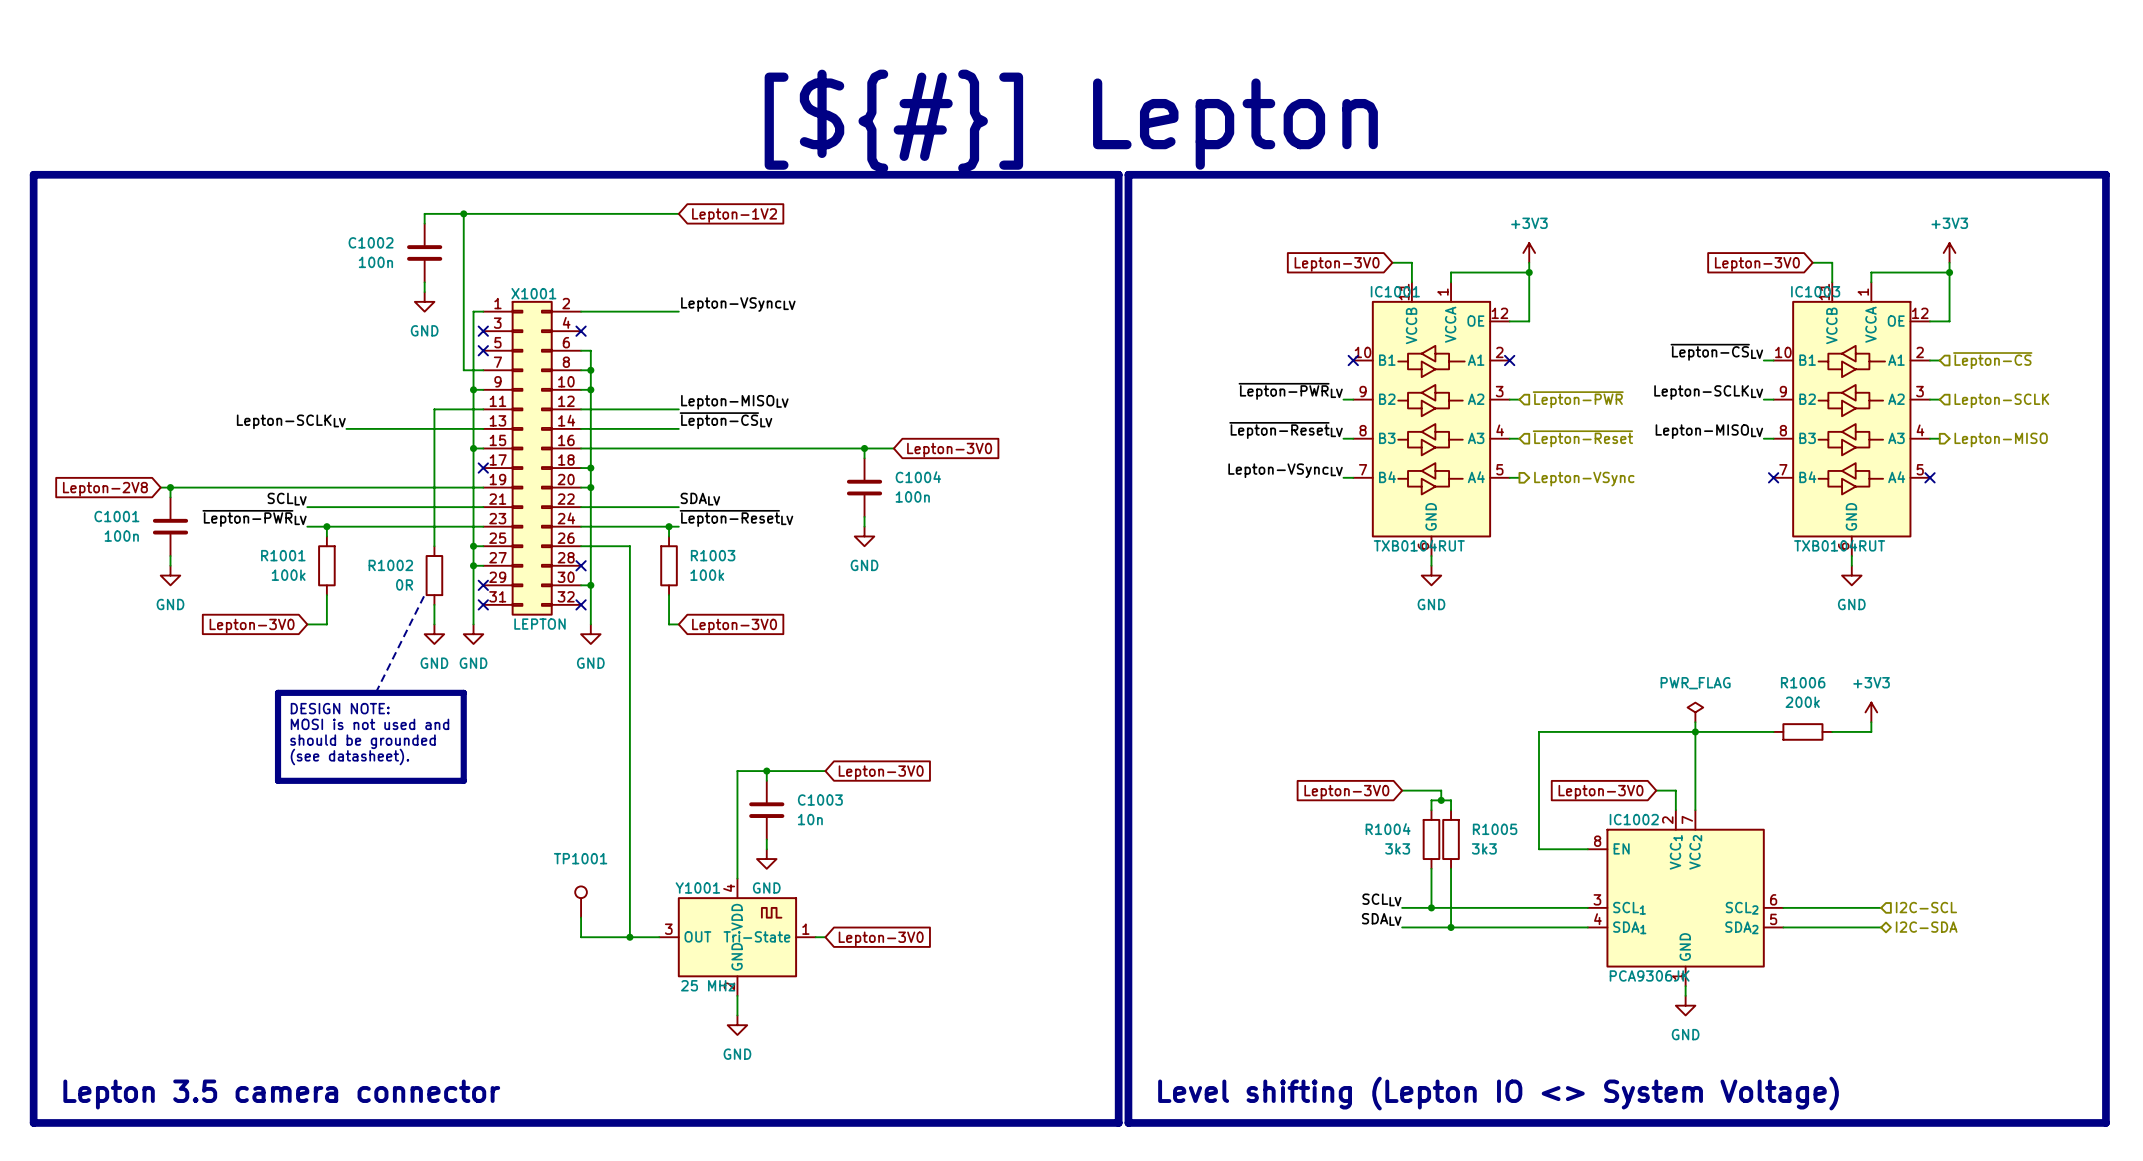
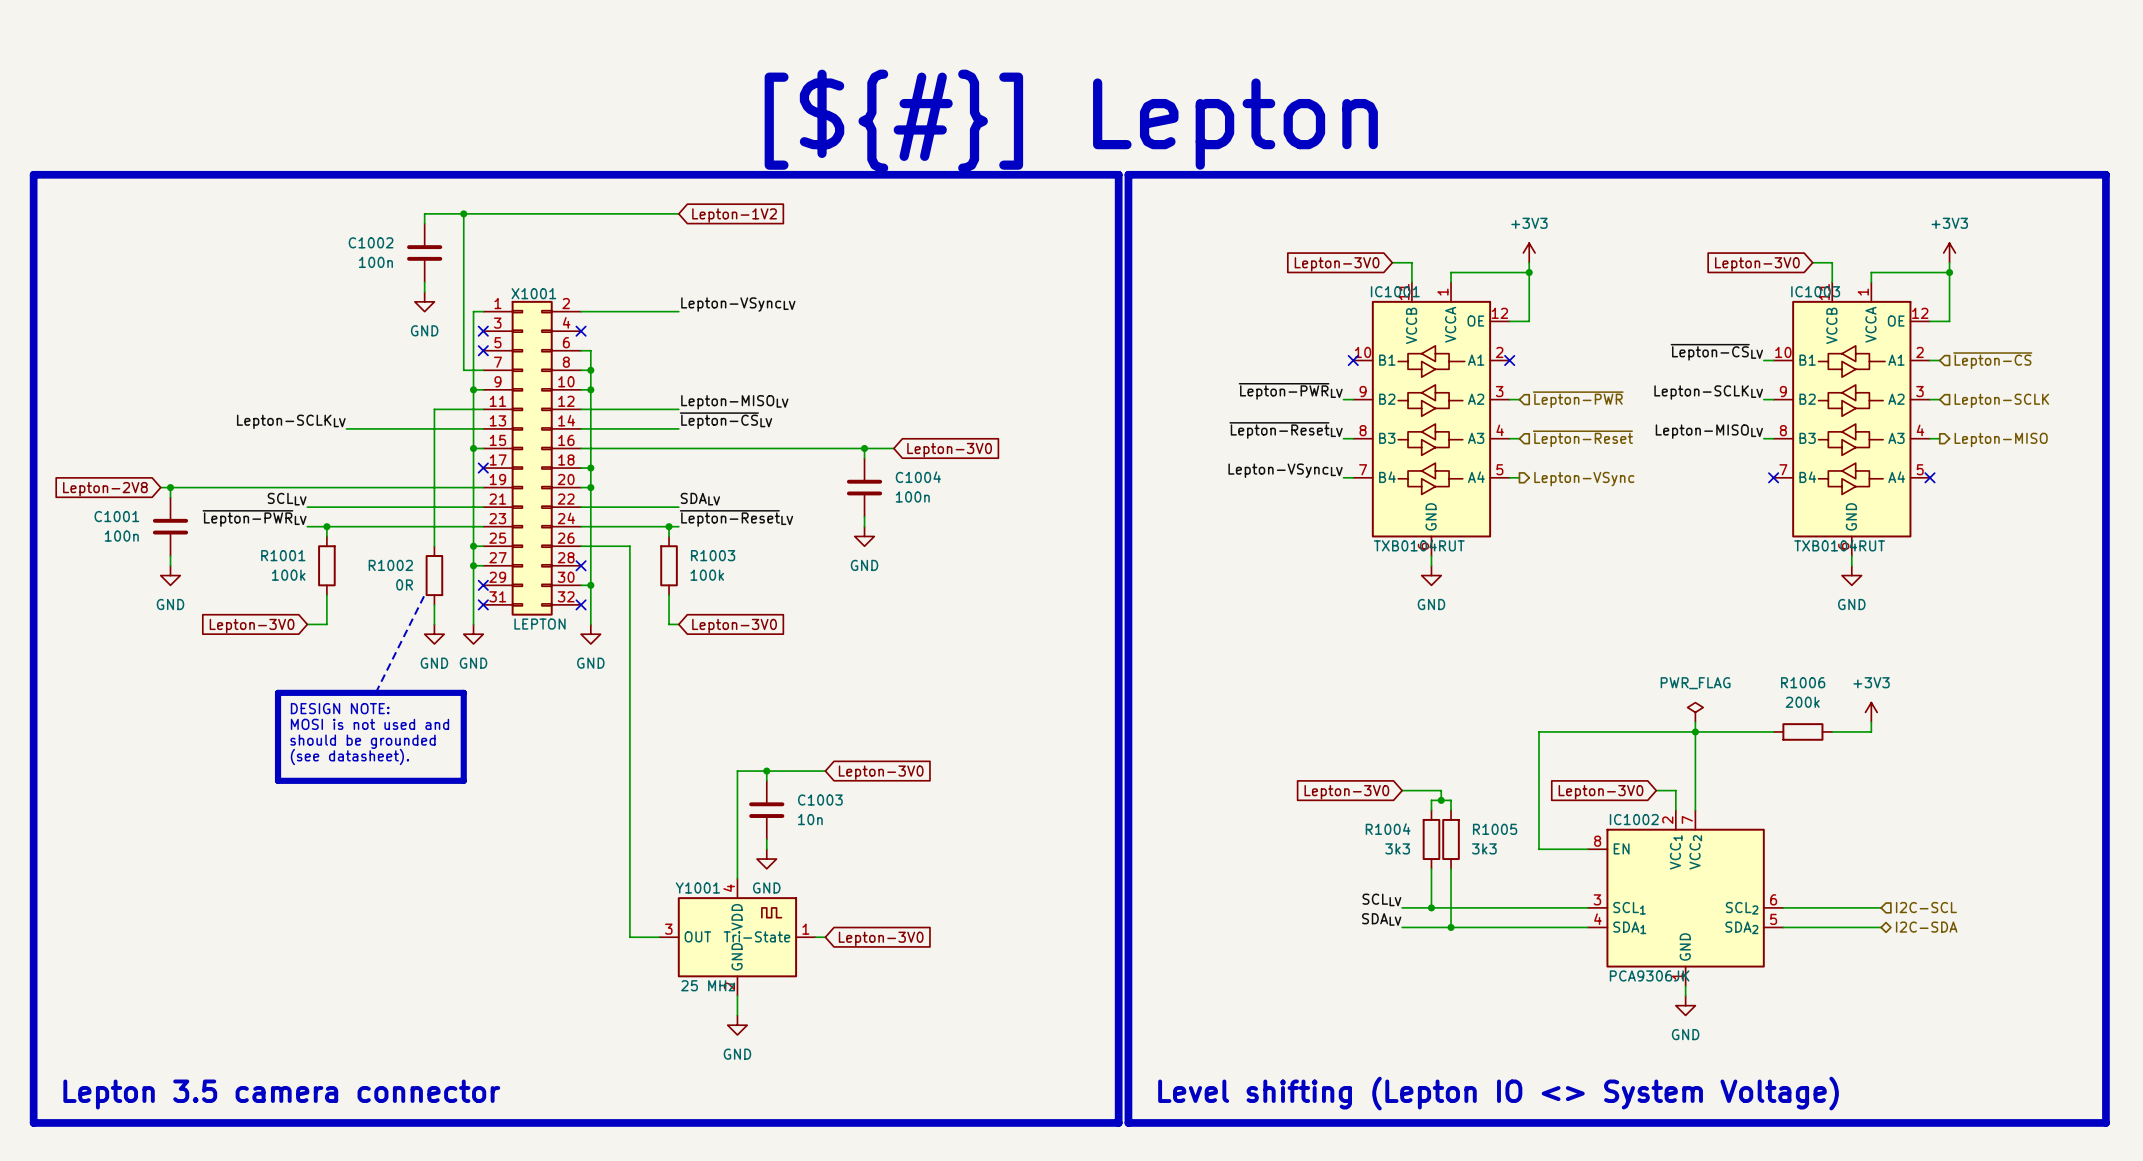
TP1001: (581, 902) -> none
wire: (581, 917) (581, 937) (629, 937) -> none
junction: (629, 937) -> none

